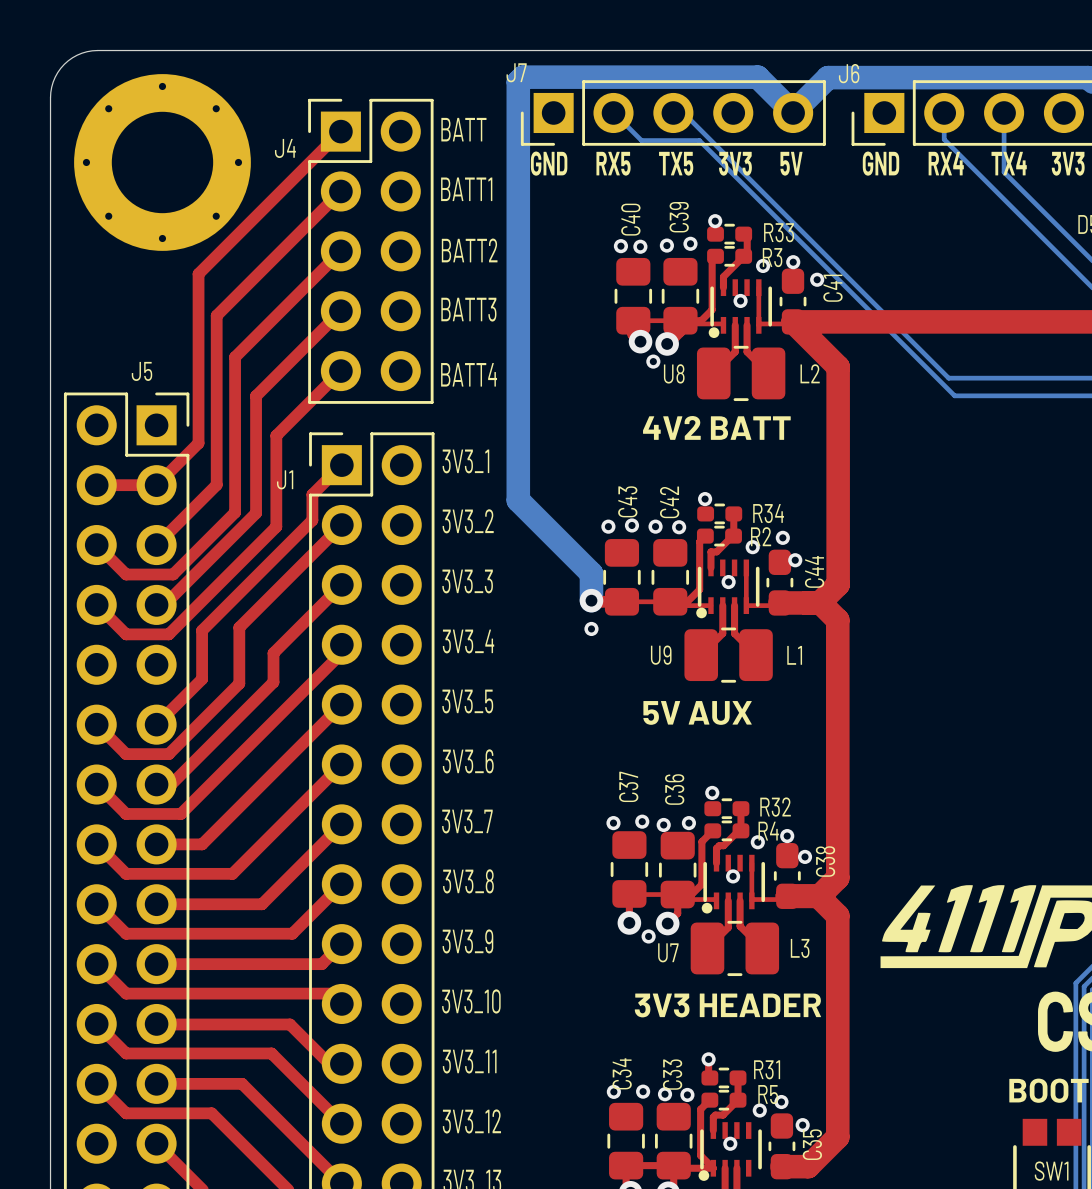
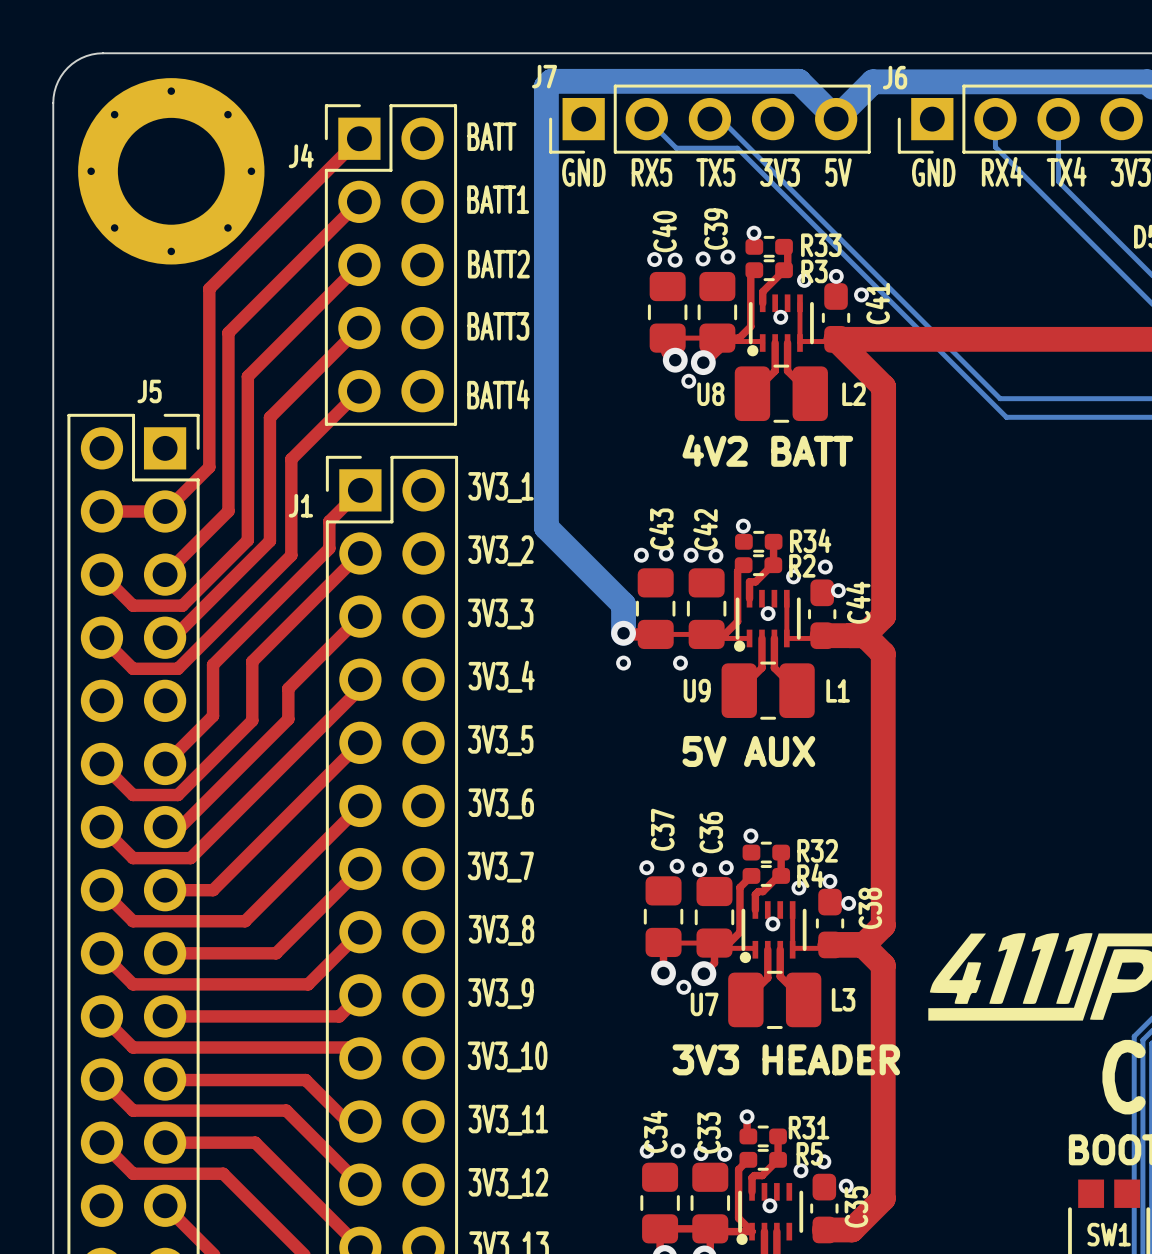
via: none -> (680, 663)

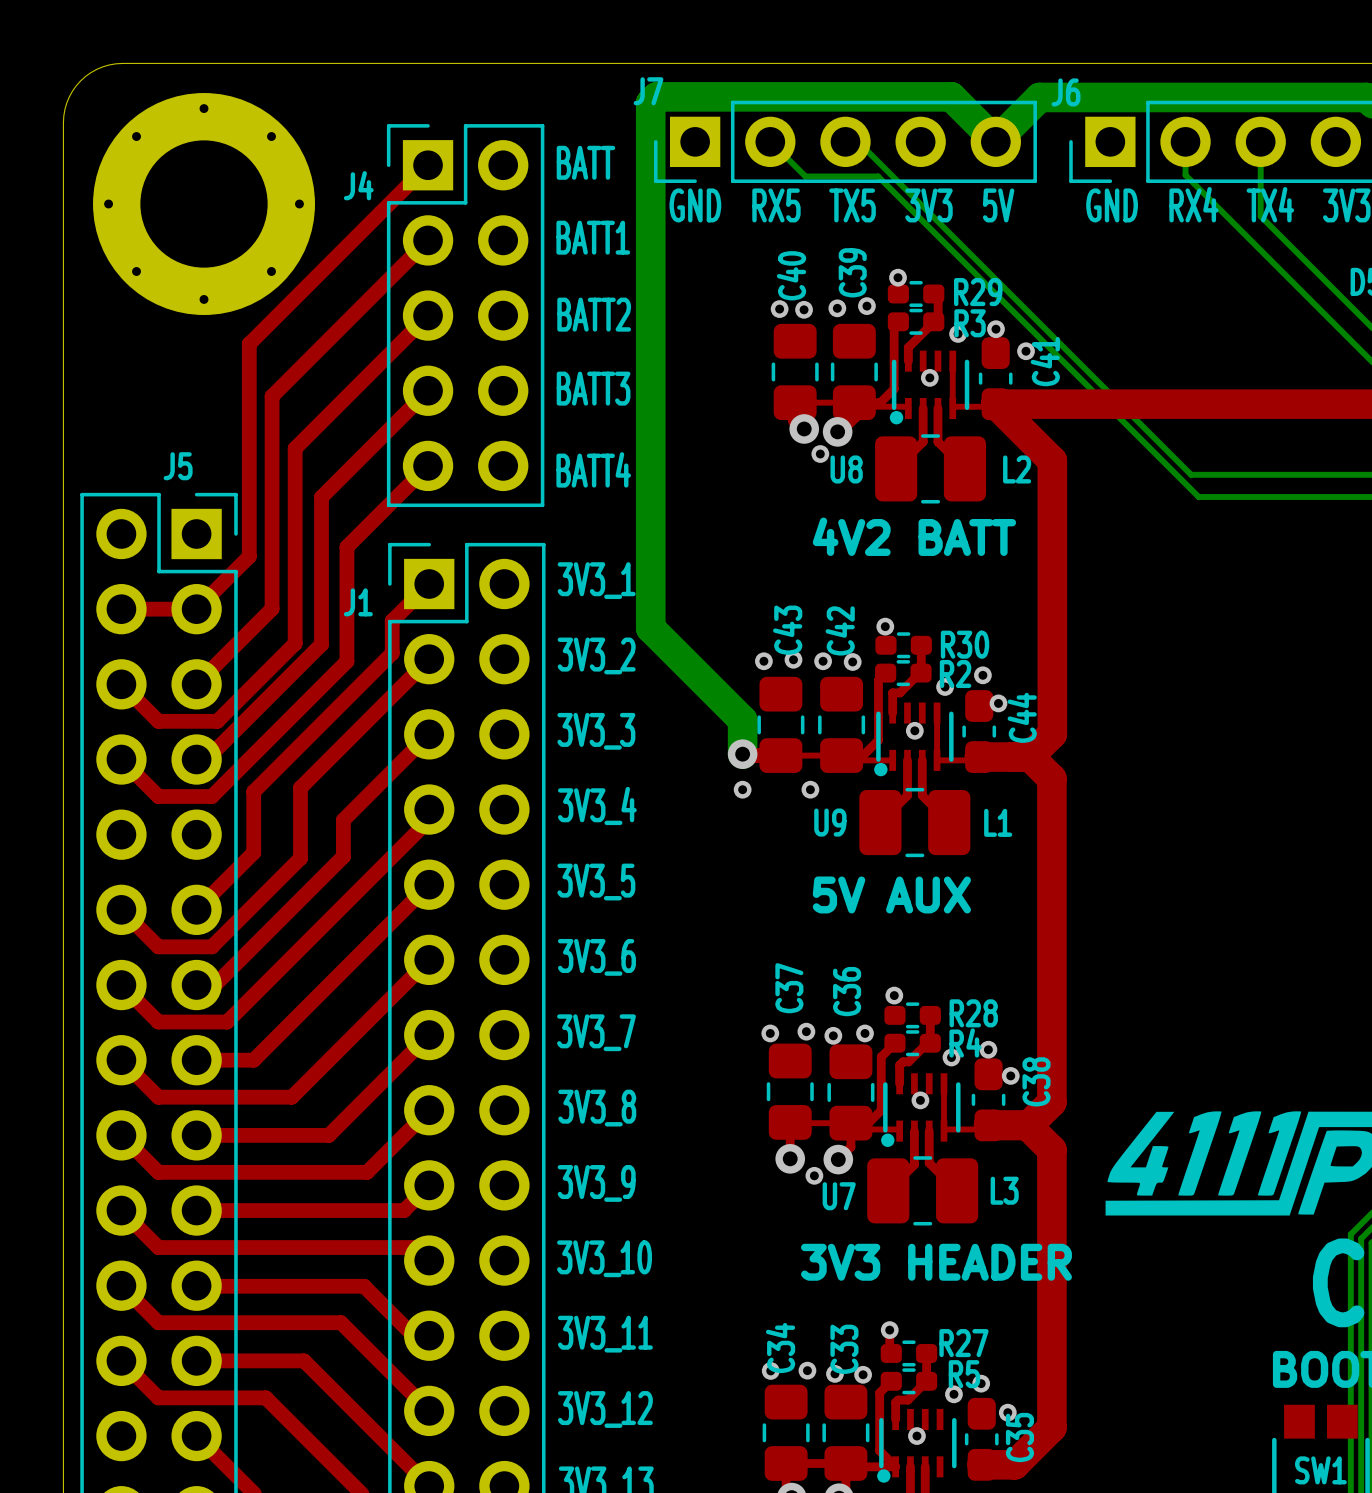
R33 name: R33 (821, 245) -> R29 (978, 292)
R34 name: R34 (810, 540) -> R30 (965, 644)
R32 name: R32 (817, 850) -> R28 (973, 1013)
R31 name: R31 (809, 1127) -> R27 (963, 1343)

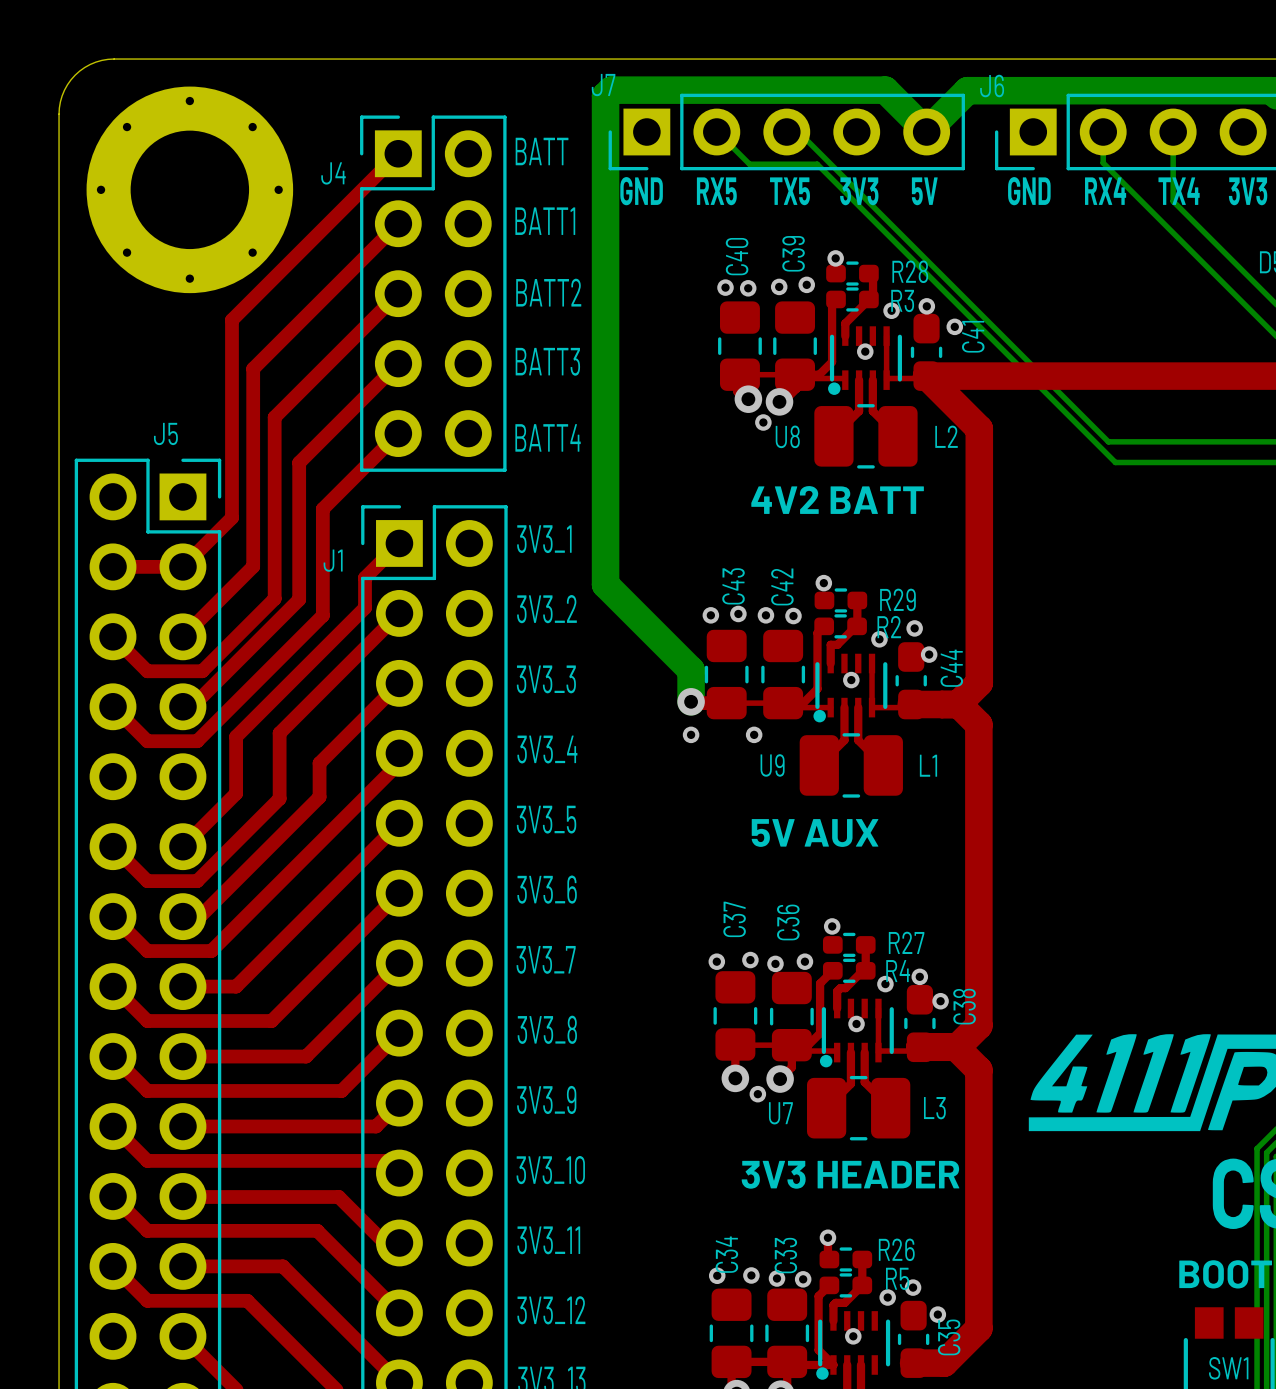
R29 name: R29 (978, 292) -> R28 (910, 271)
R30 name: R30 (965, 644) -> R29 (897, 599)
R28 name: R28 (973, 1013) -> R27 (906, 942)
R27 name: R27 (963, 1343) -> R26 (896, 1249)

